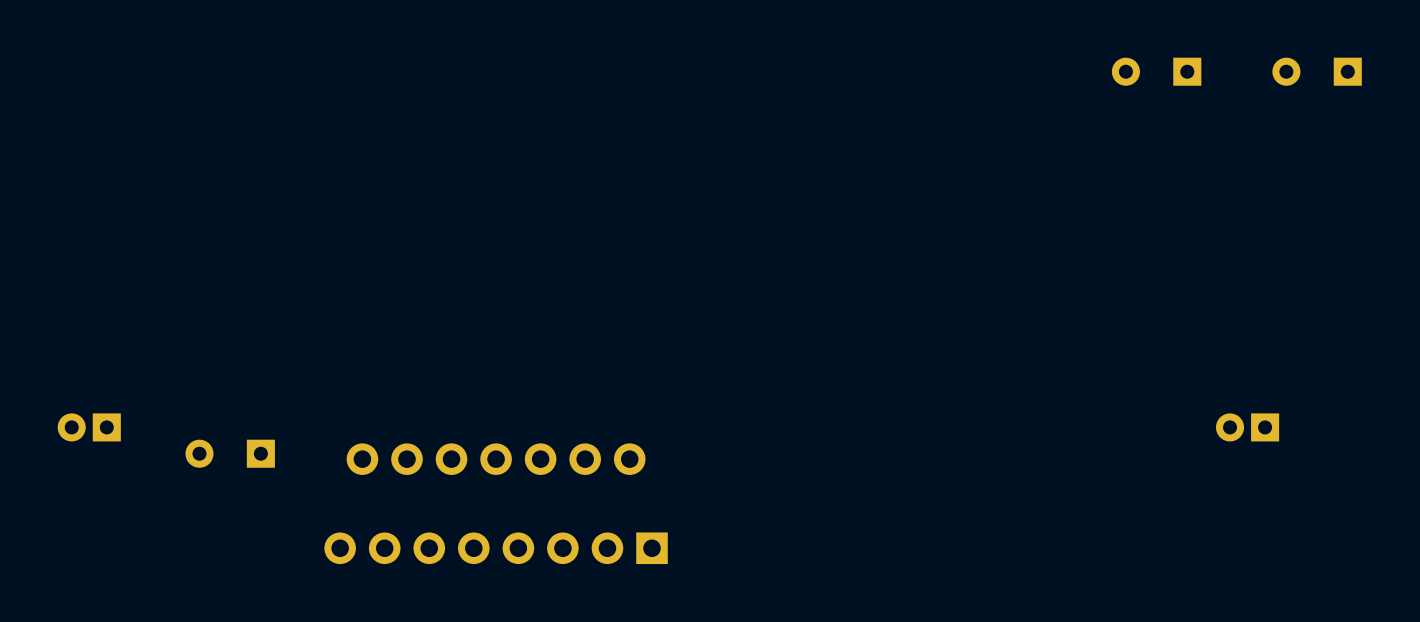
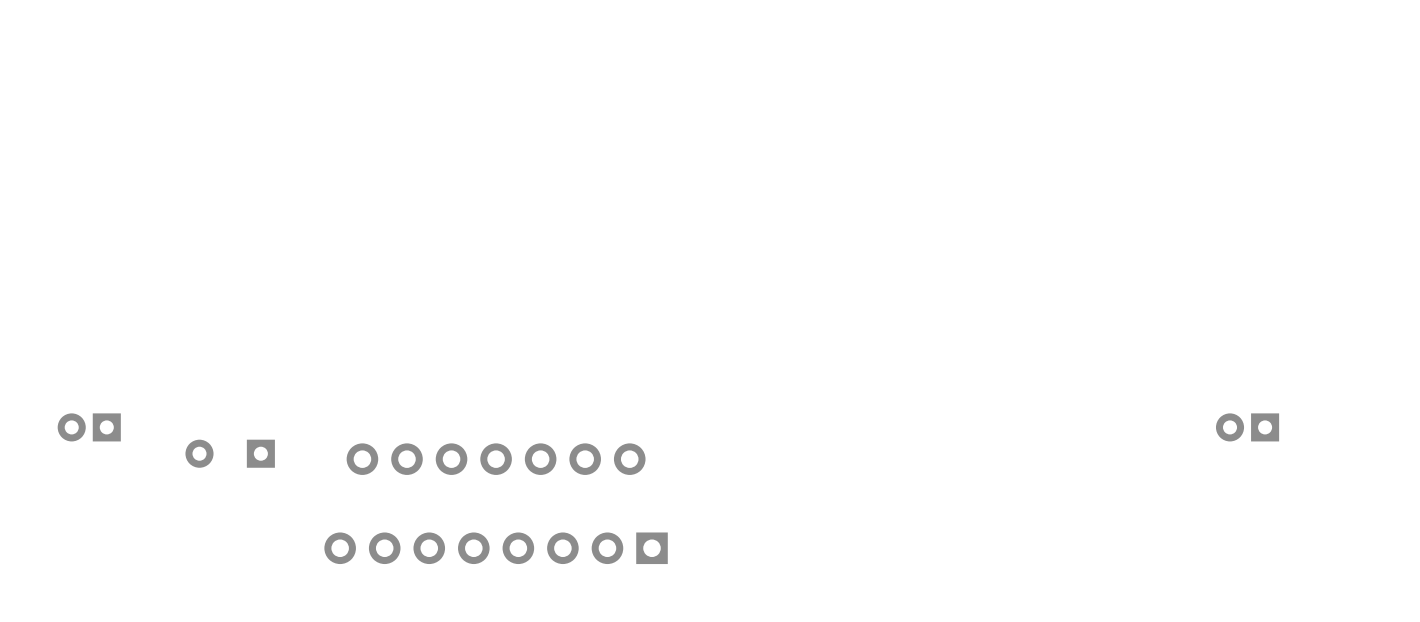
part: (1156, 71) -> none
part: (1317, 71) -> none

